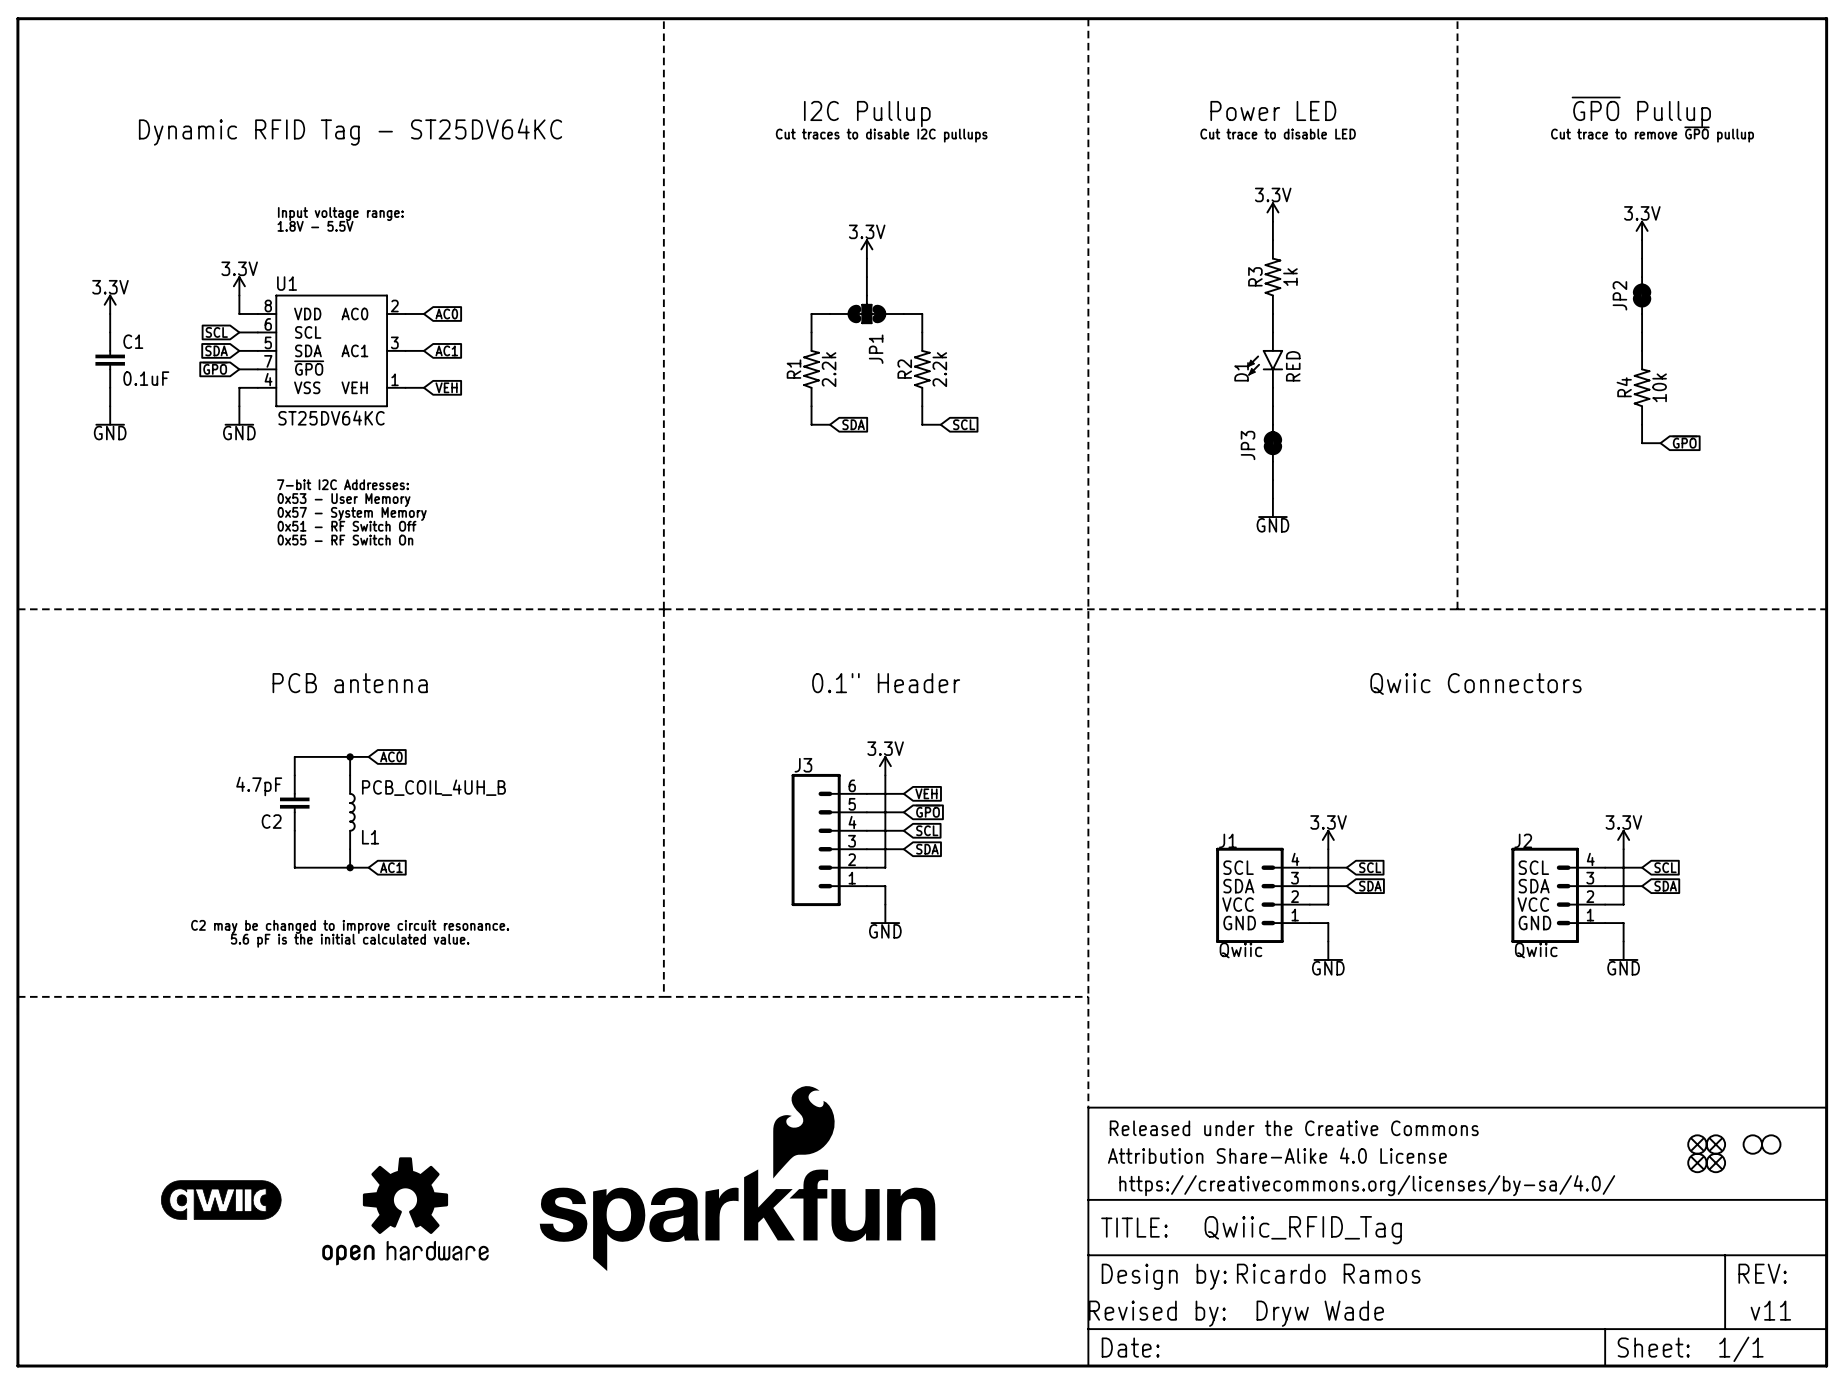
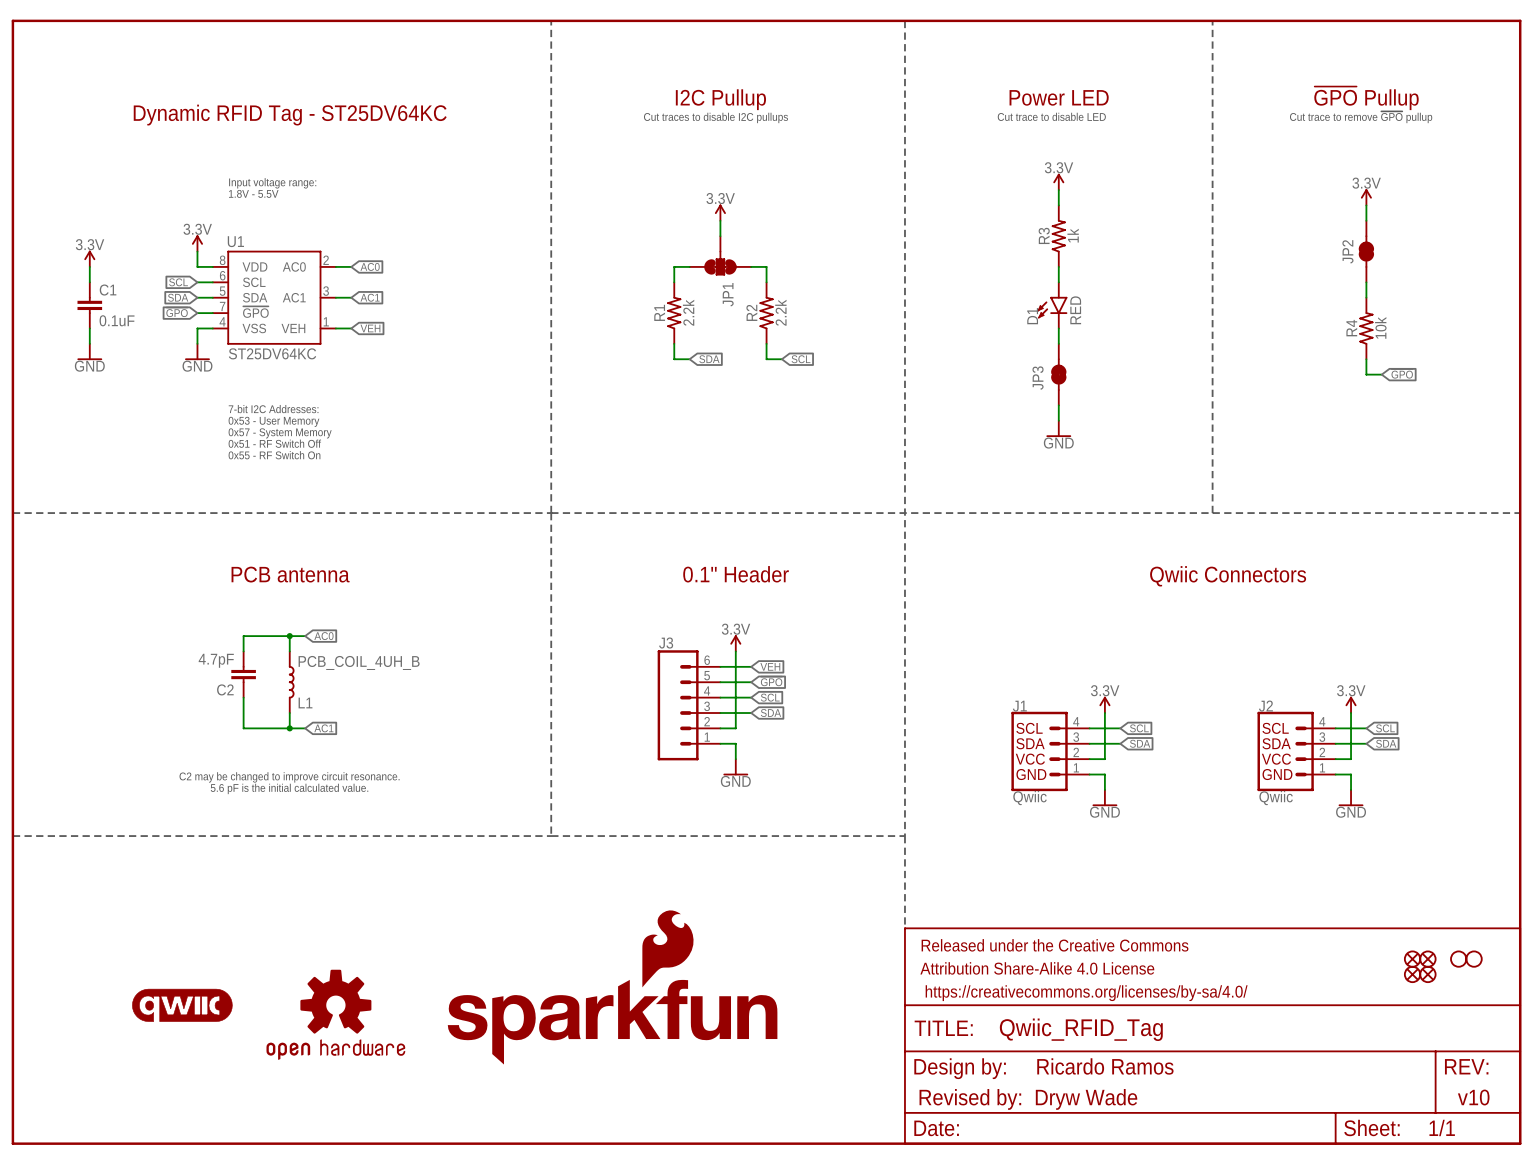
text: v11 (1770, 1310) -> v10 (1473, 1097)

